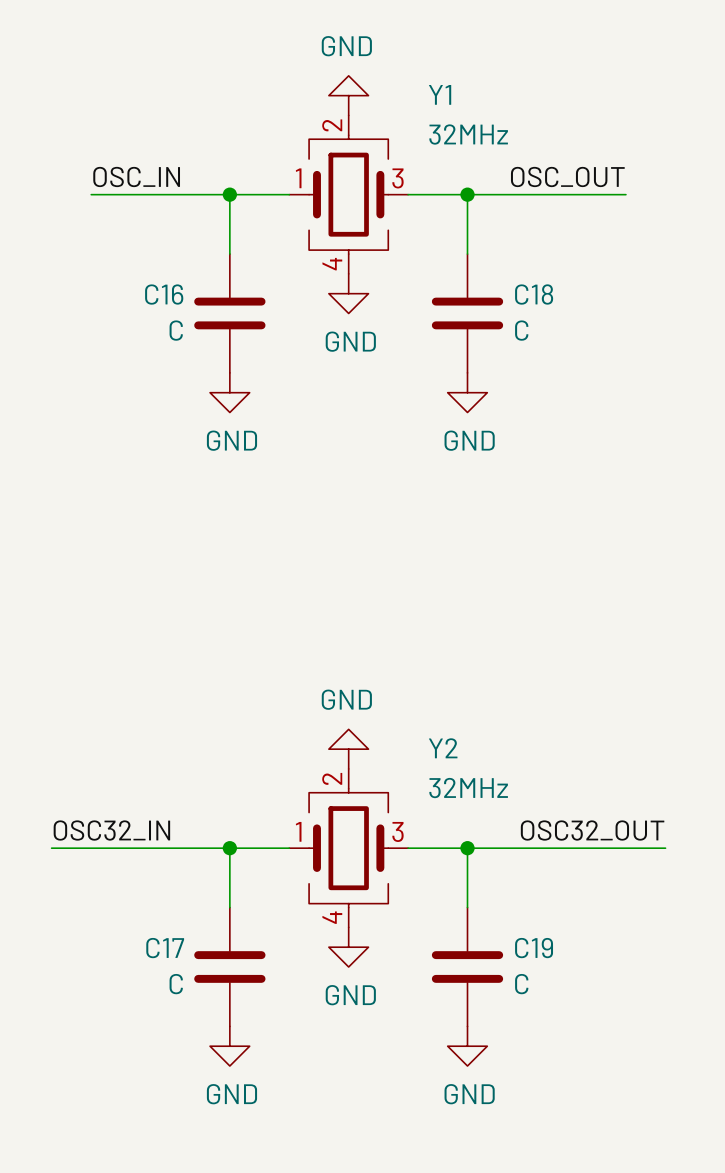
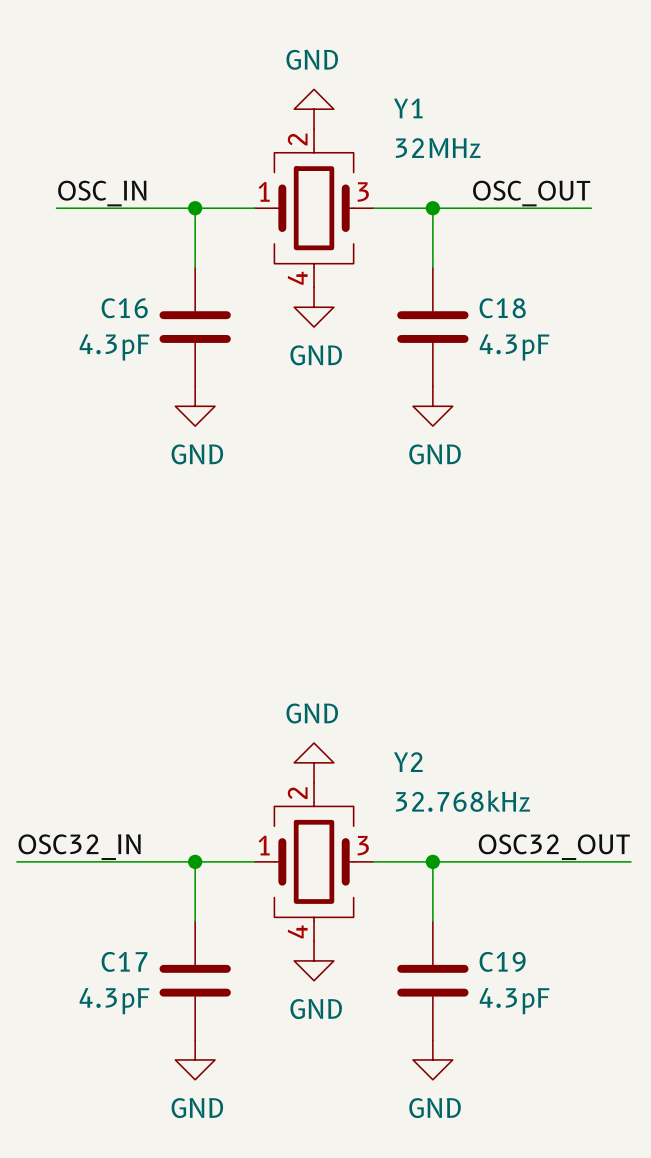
C16 value: C (176, 330) -> 4.3pF (114, 347)
C18 value: C (521, 330) -> 4.3pF (514, 347)
Y2 value: 32MHz (468, 788) -> 32.768kHz (462, 801)
C17 value: C (176, 984) -> 4.3pF (114, 1001)
C19 value: C (521, 984) -> 4.3pF (514, 1001)

